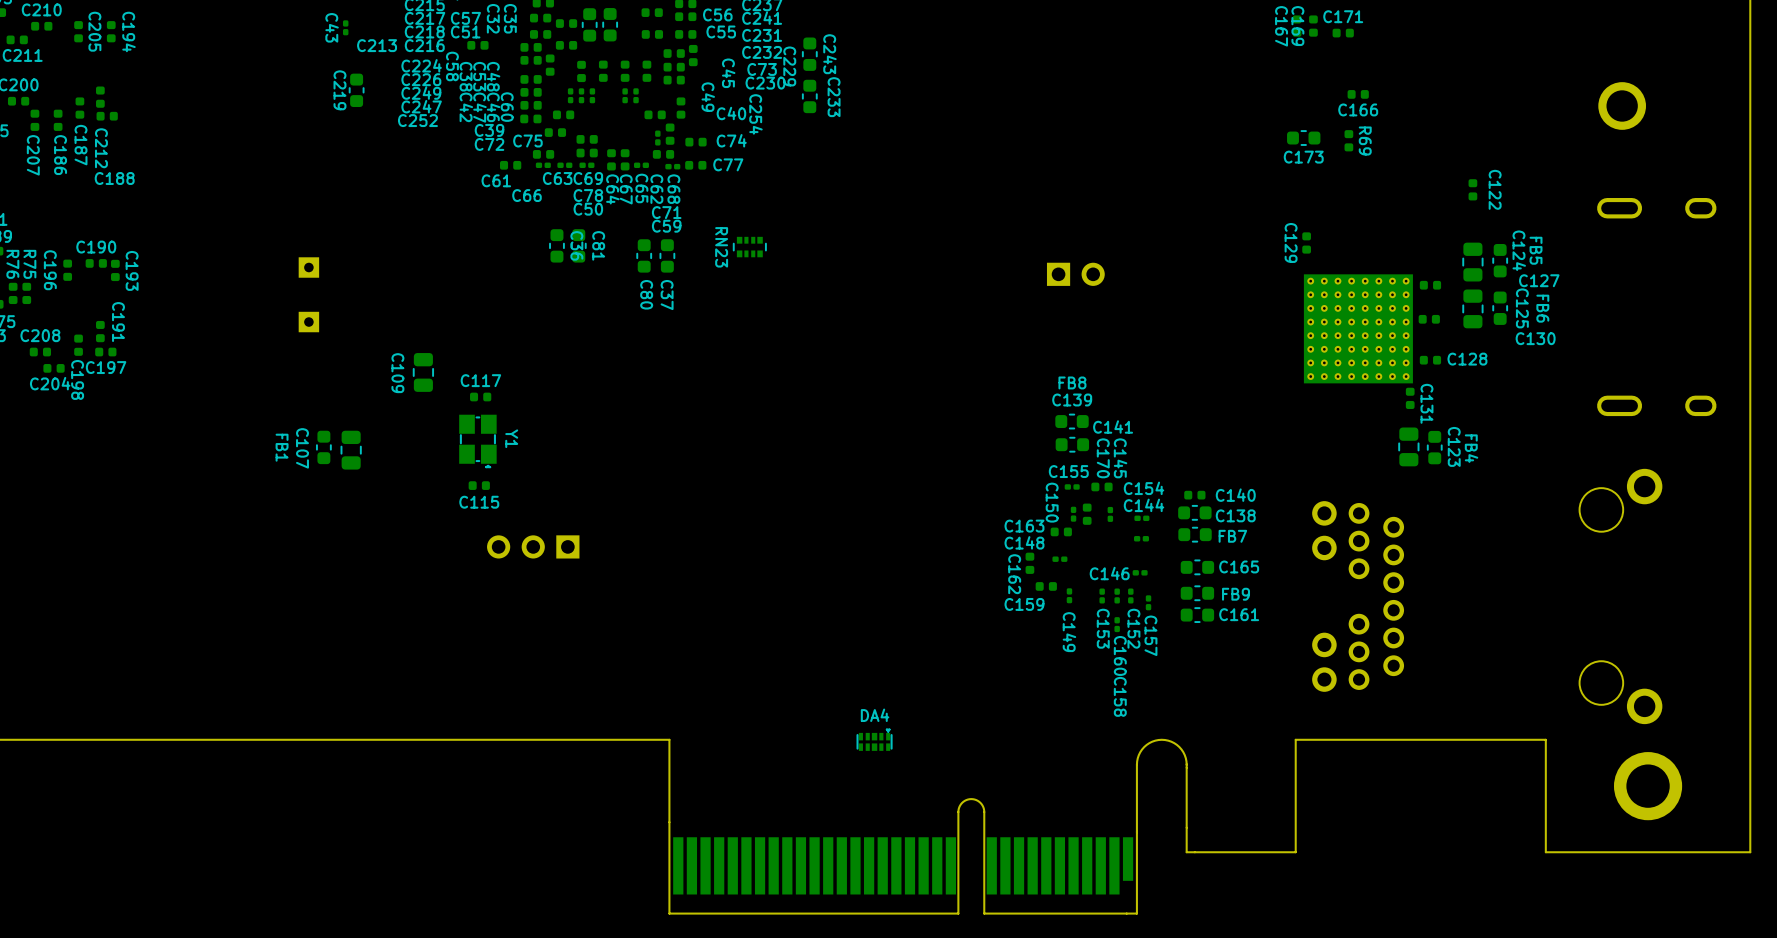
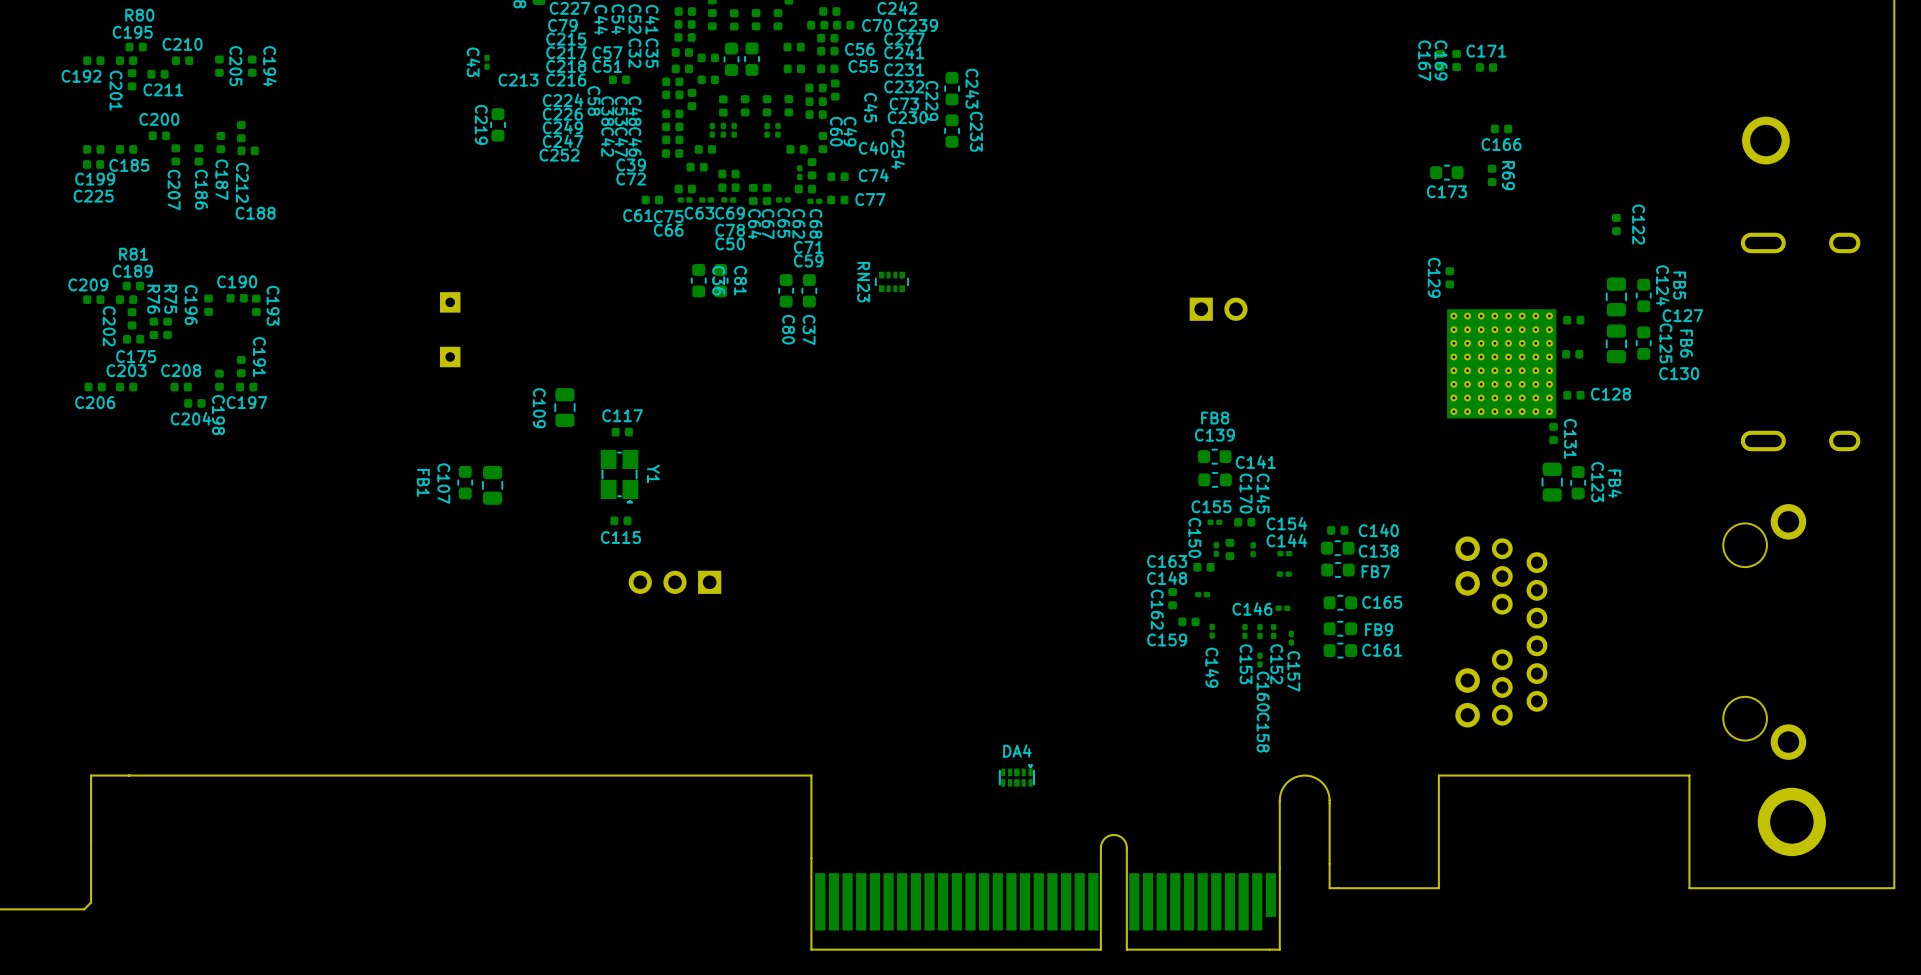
C60 name position: C60 (507, 107) -> C60 (836, 131)
C75 name position: C75 (527, 141) -> C75 (668, 216)

